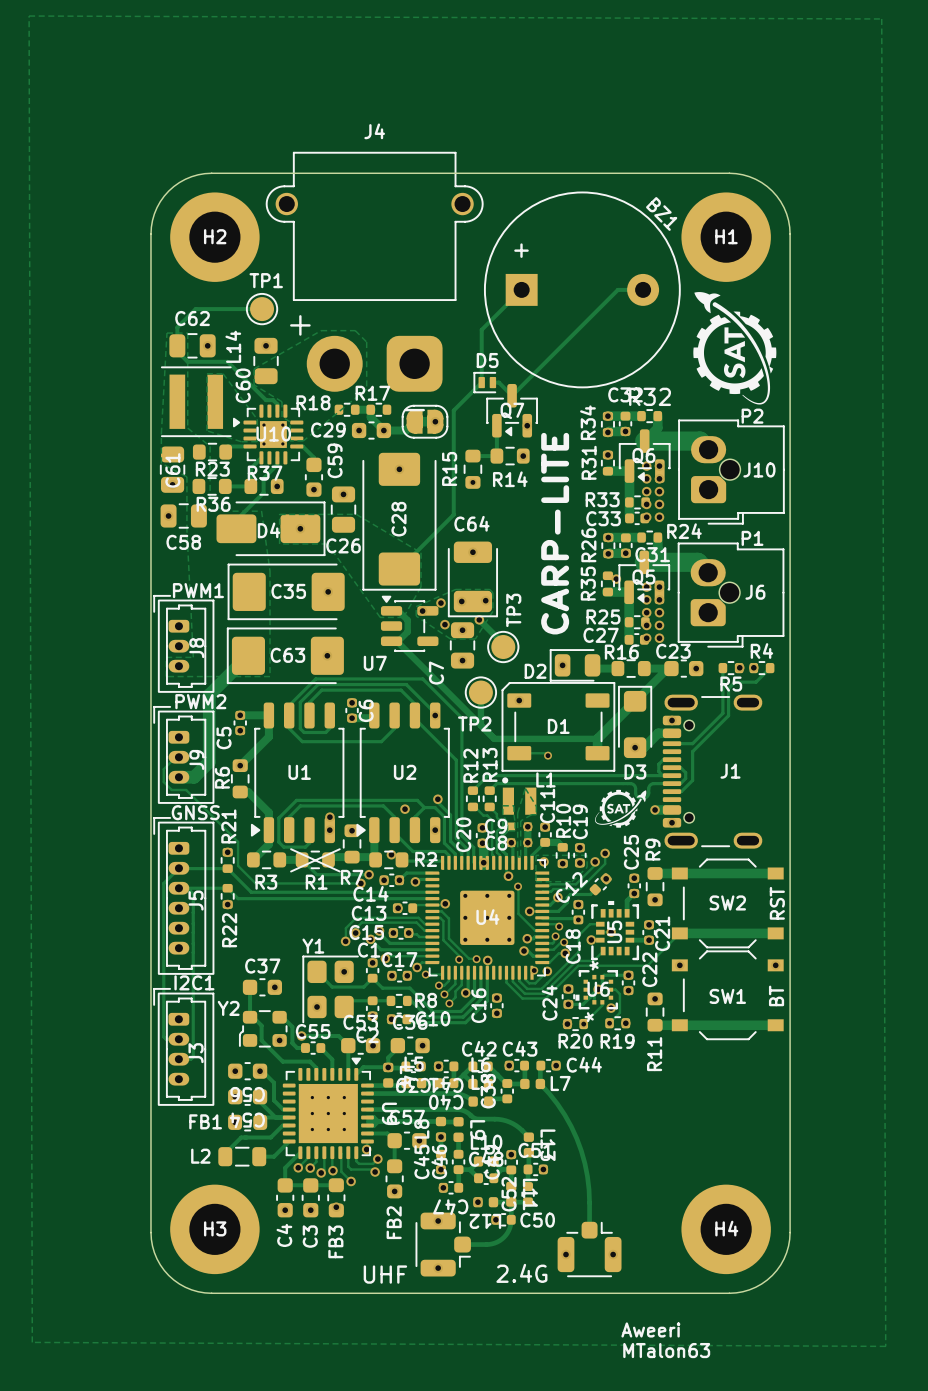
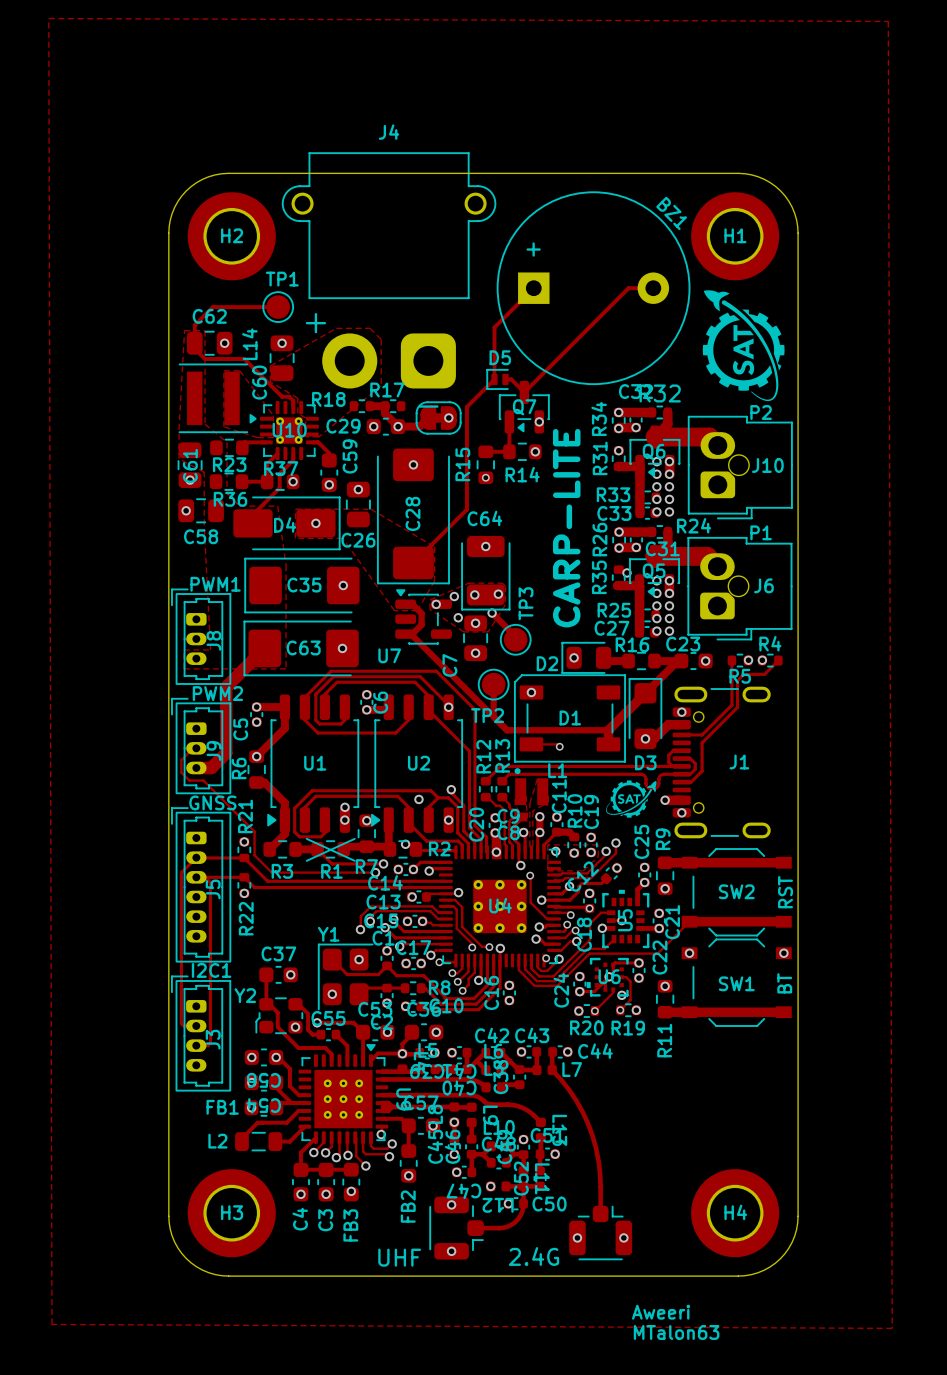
U5 text: * (593, 965) -> none
U6 text: * (589, 1017) -> none

